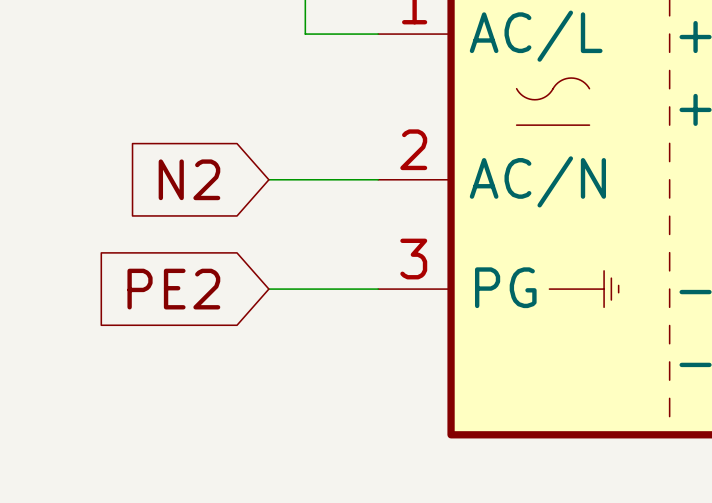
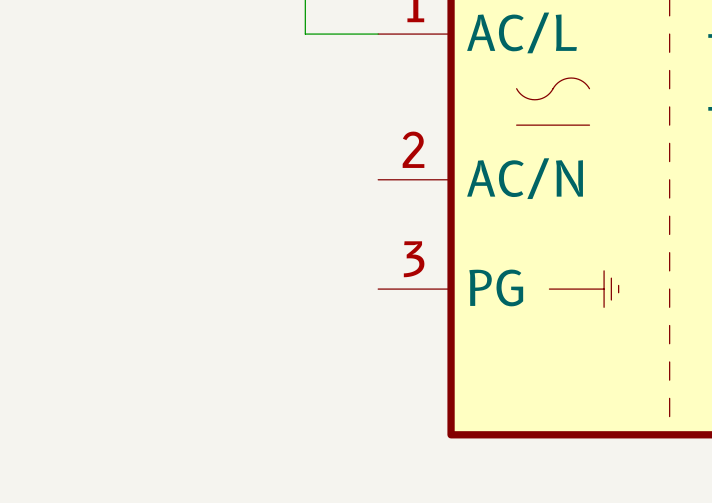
global label: N2 (189, 179) -> none
wire: (268, 179) (378, 179) -> none
global label: PE2 (173, 289) -> none
wire: (268, 289) (378, 289) -> none

